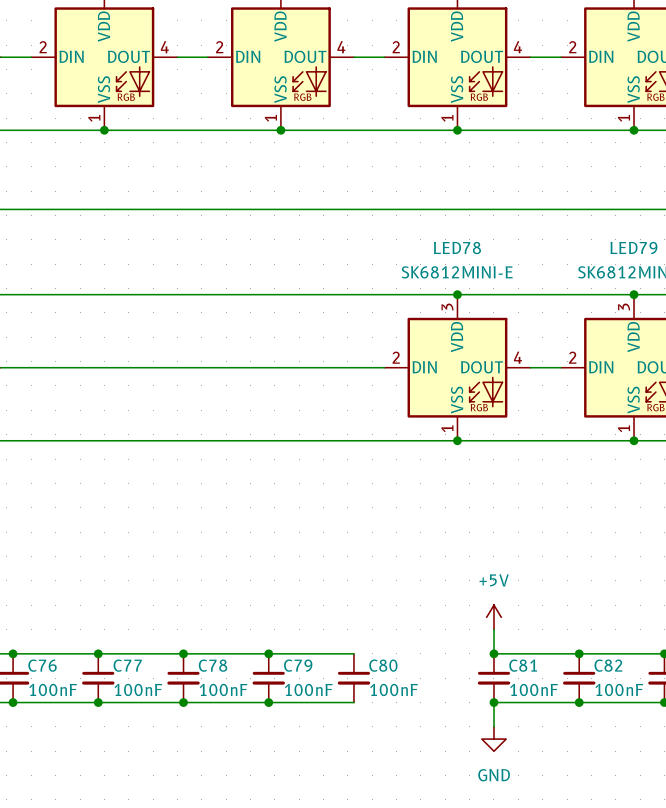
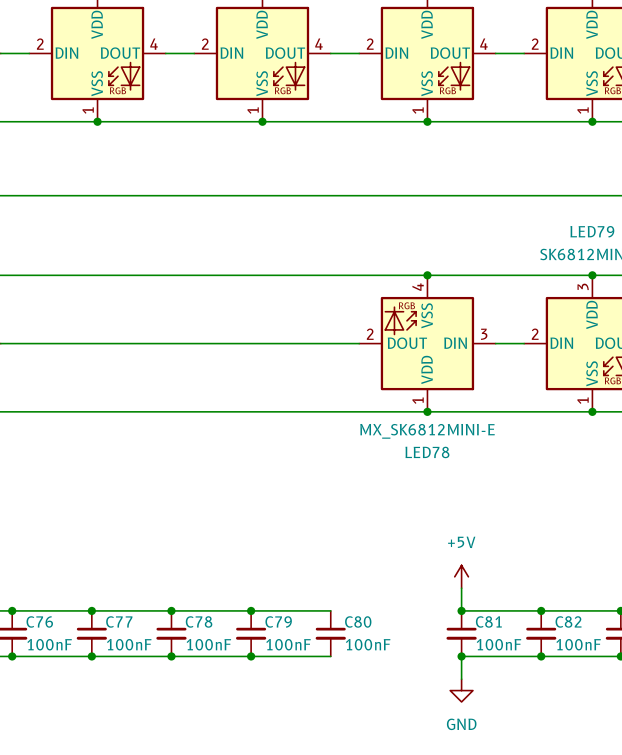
LED78 name position: LED78 (457, 248) -> LED78 (427, 452)
LED78 value: SK6812MINI-E (457, 272) -> MX_SK6812MINI-E (427, 431)
LED78 symbol: [384, 294, 531, 441] -> [359, 275, 496, 412]

